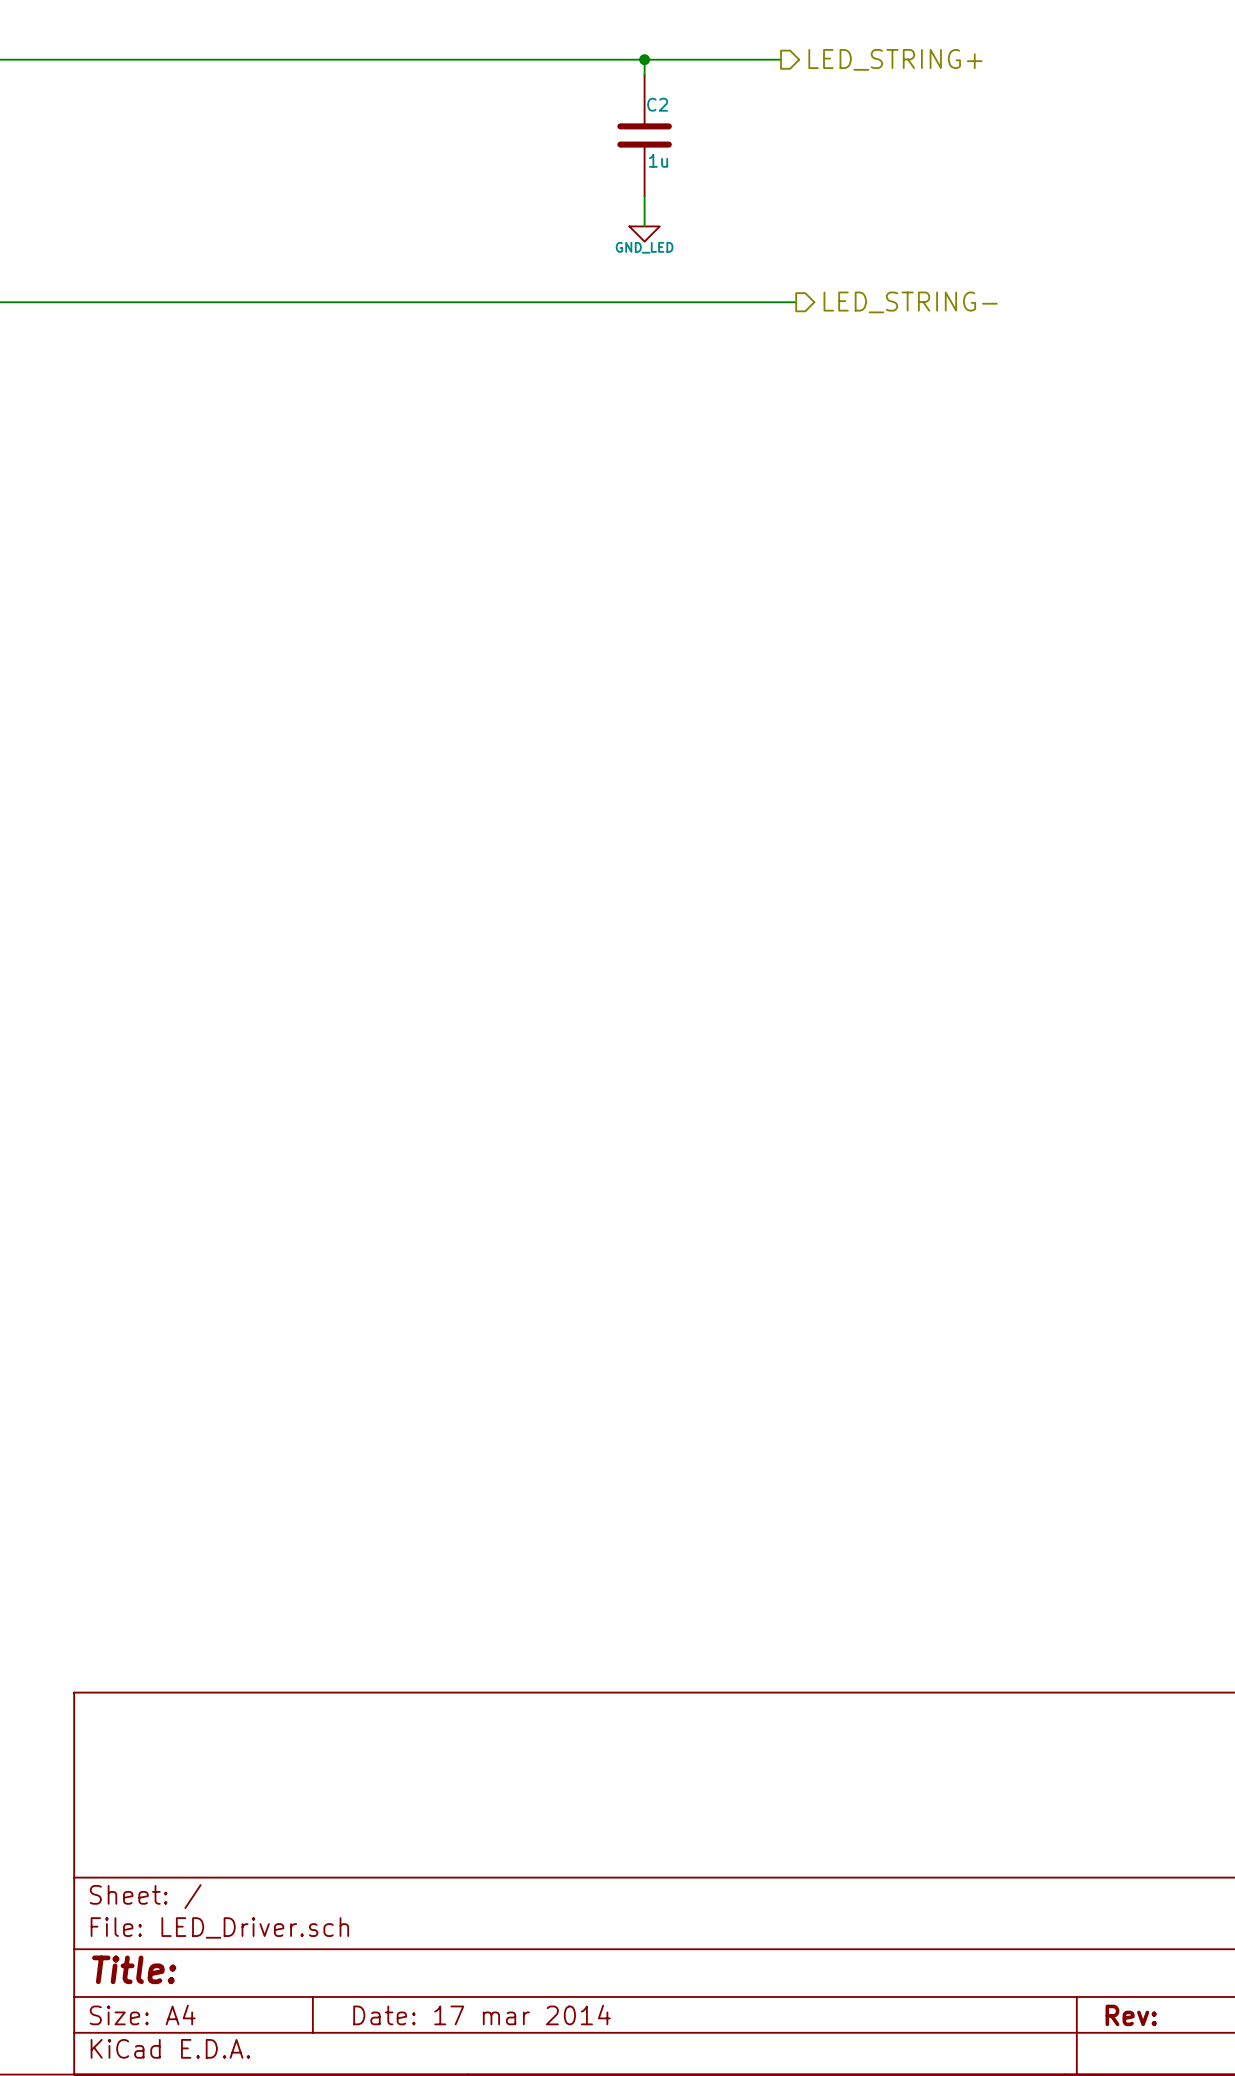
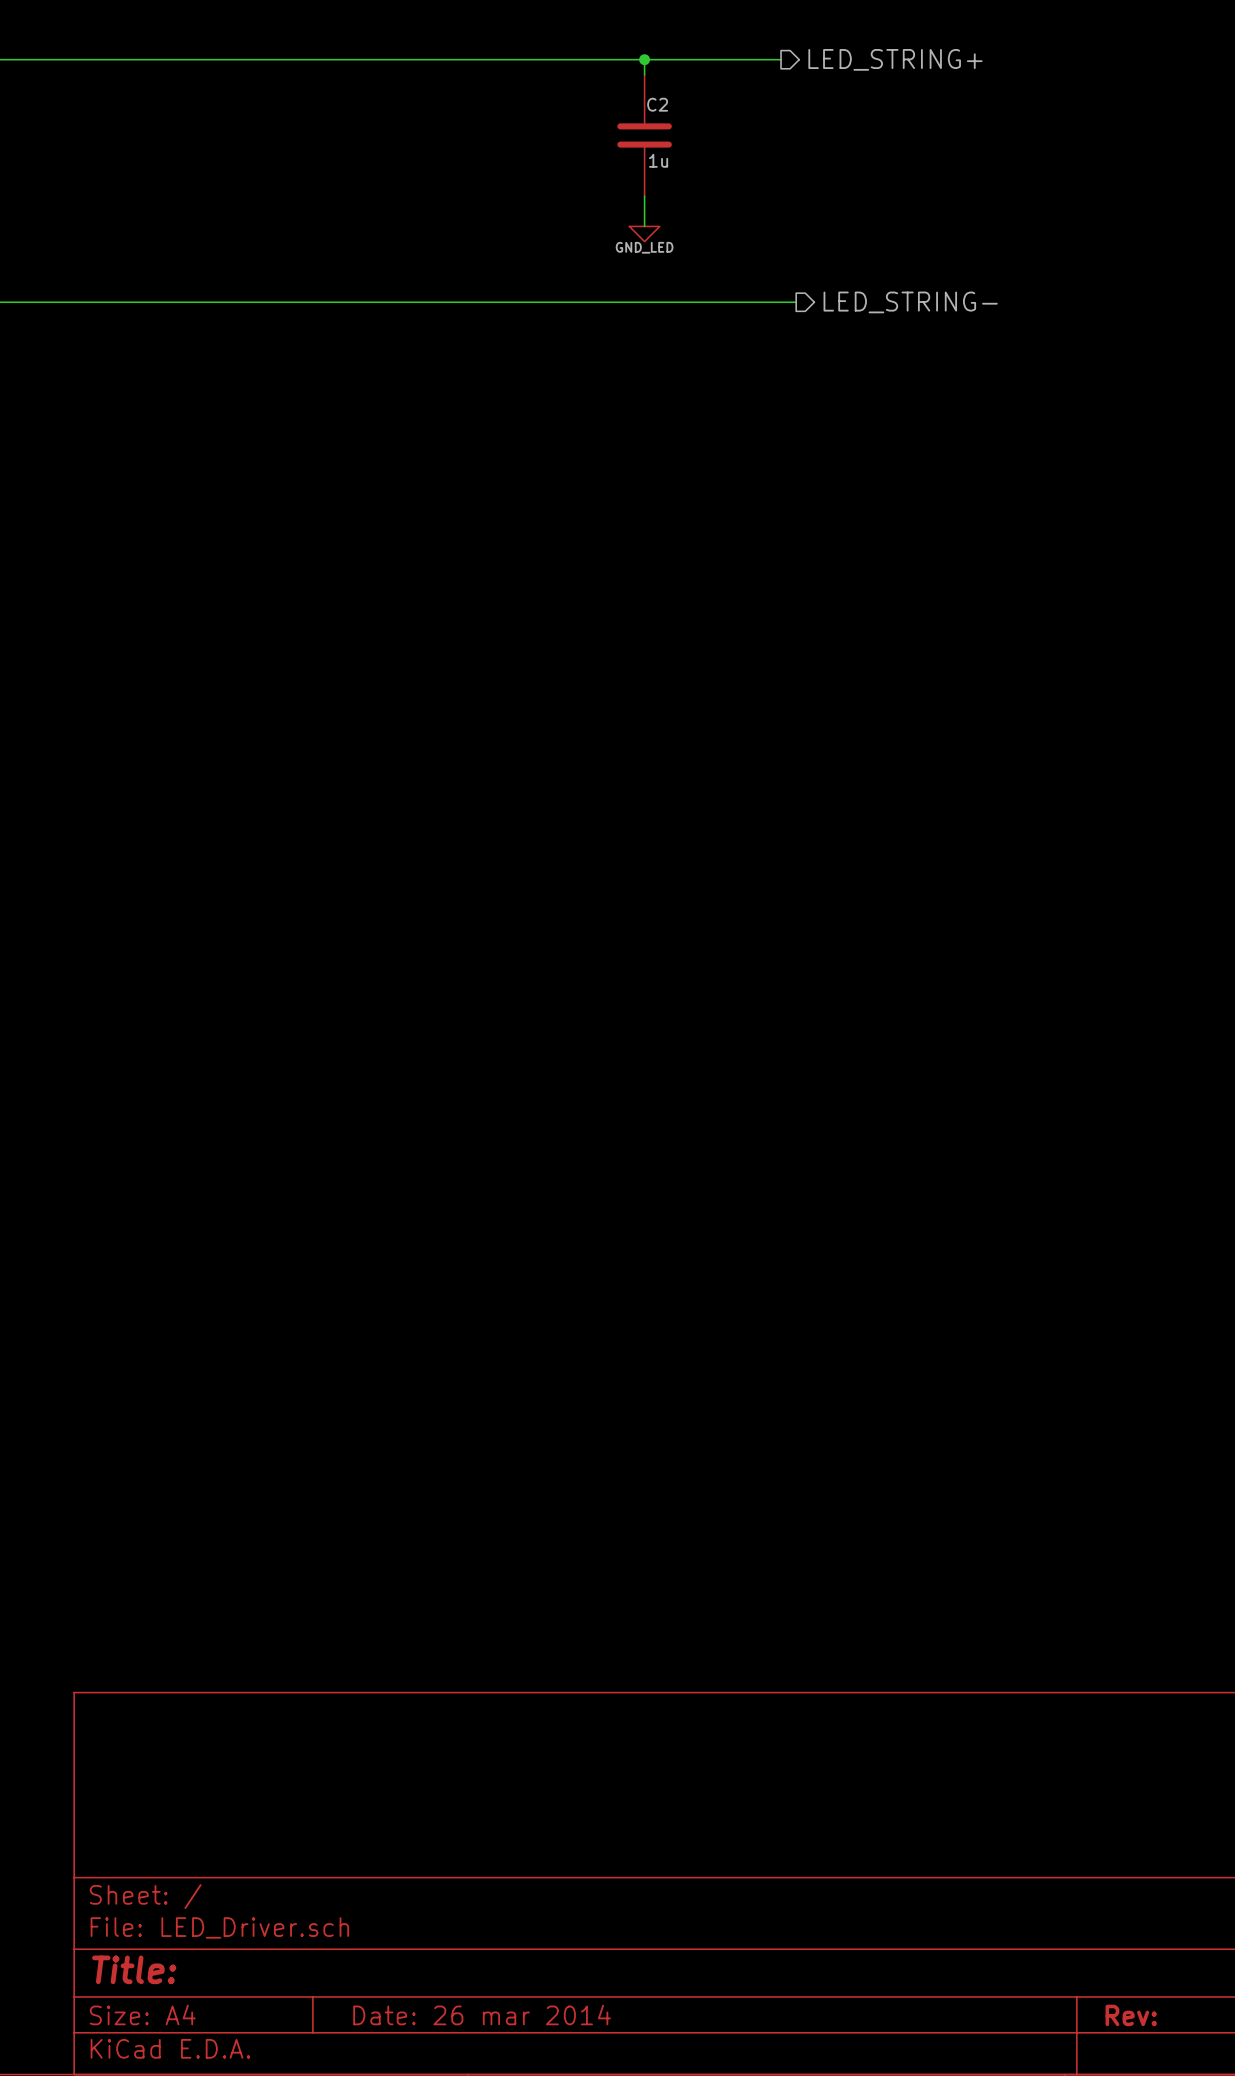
title block: Date: 17 mar 2014 (482, 2014) -> Date: 26 mar 2014 (482, 2014)

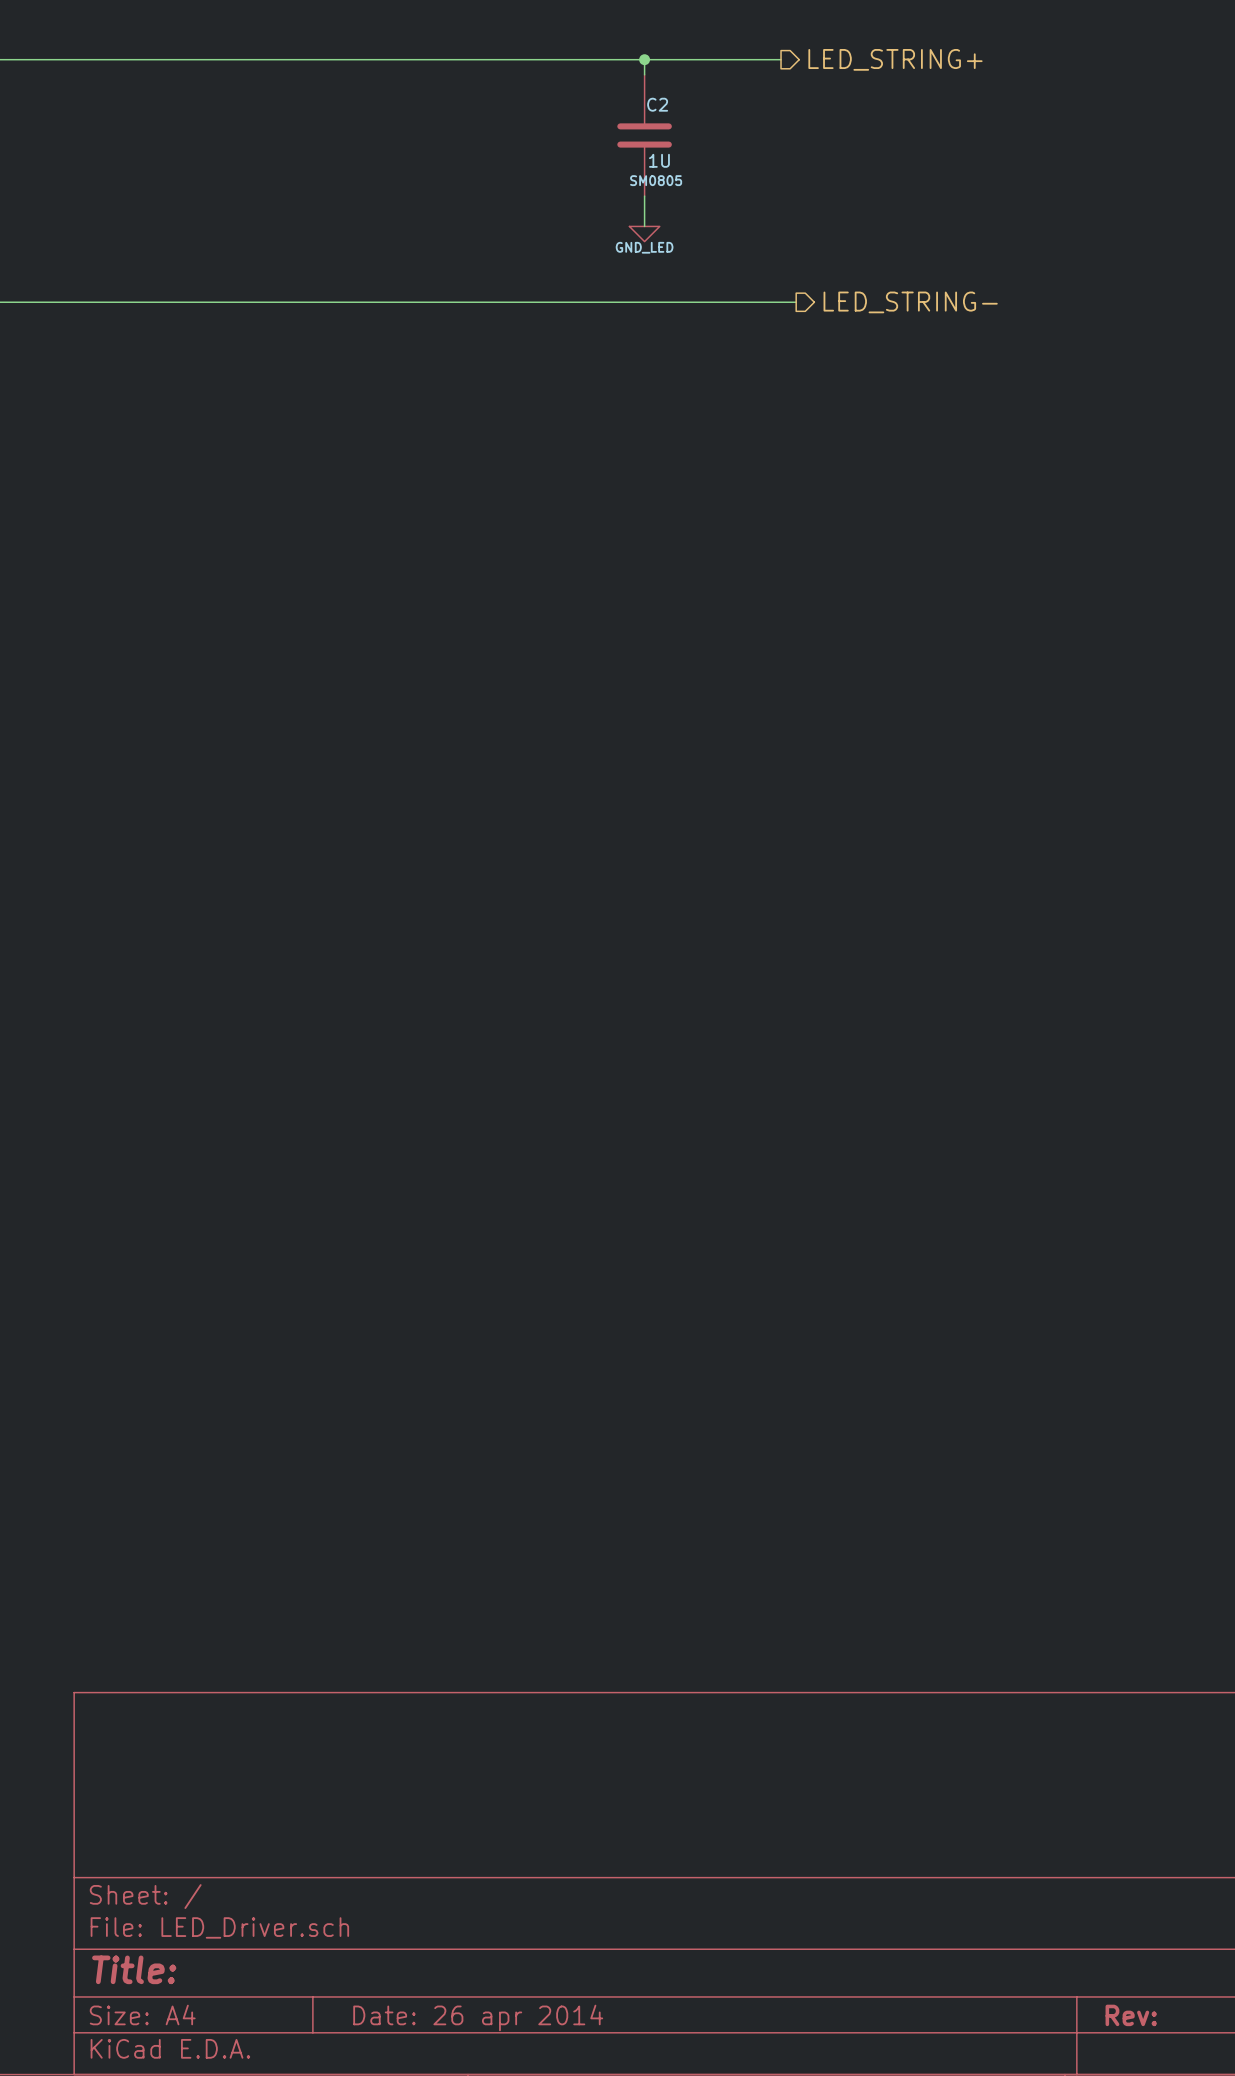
C2 value: 1u (658, 160) -> 1U (659, 160)
C2 text: none -> SM0805 (656, 180)
title block: Date: 26 mar 2014 (482, 2014) -> Date: 26 apr 2014 (478, 2017)

